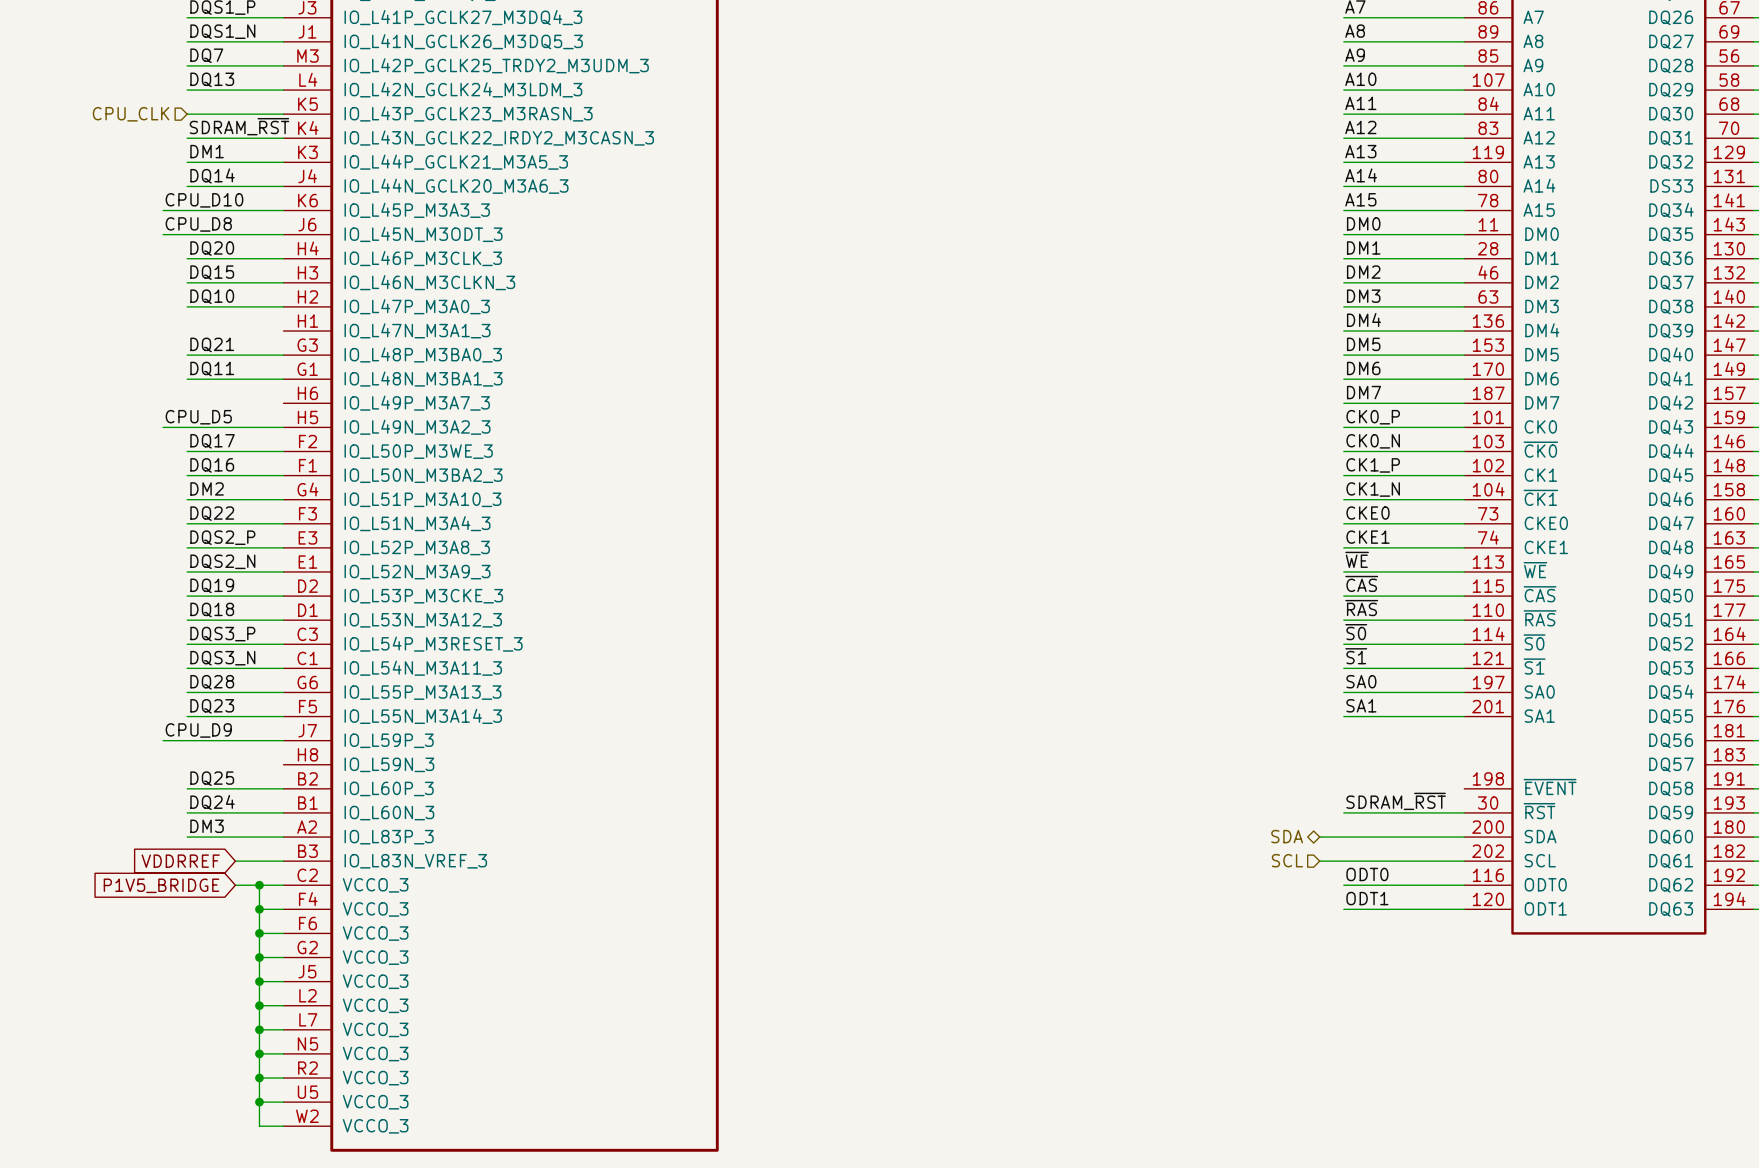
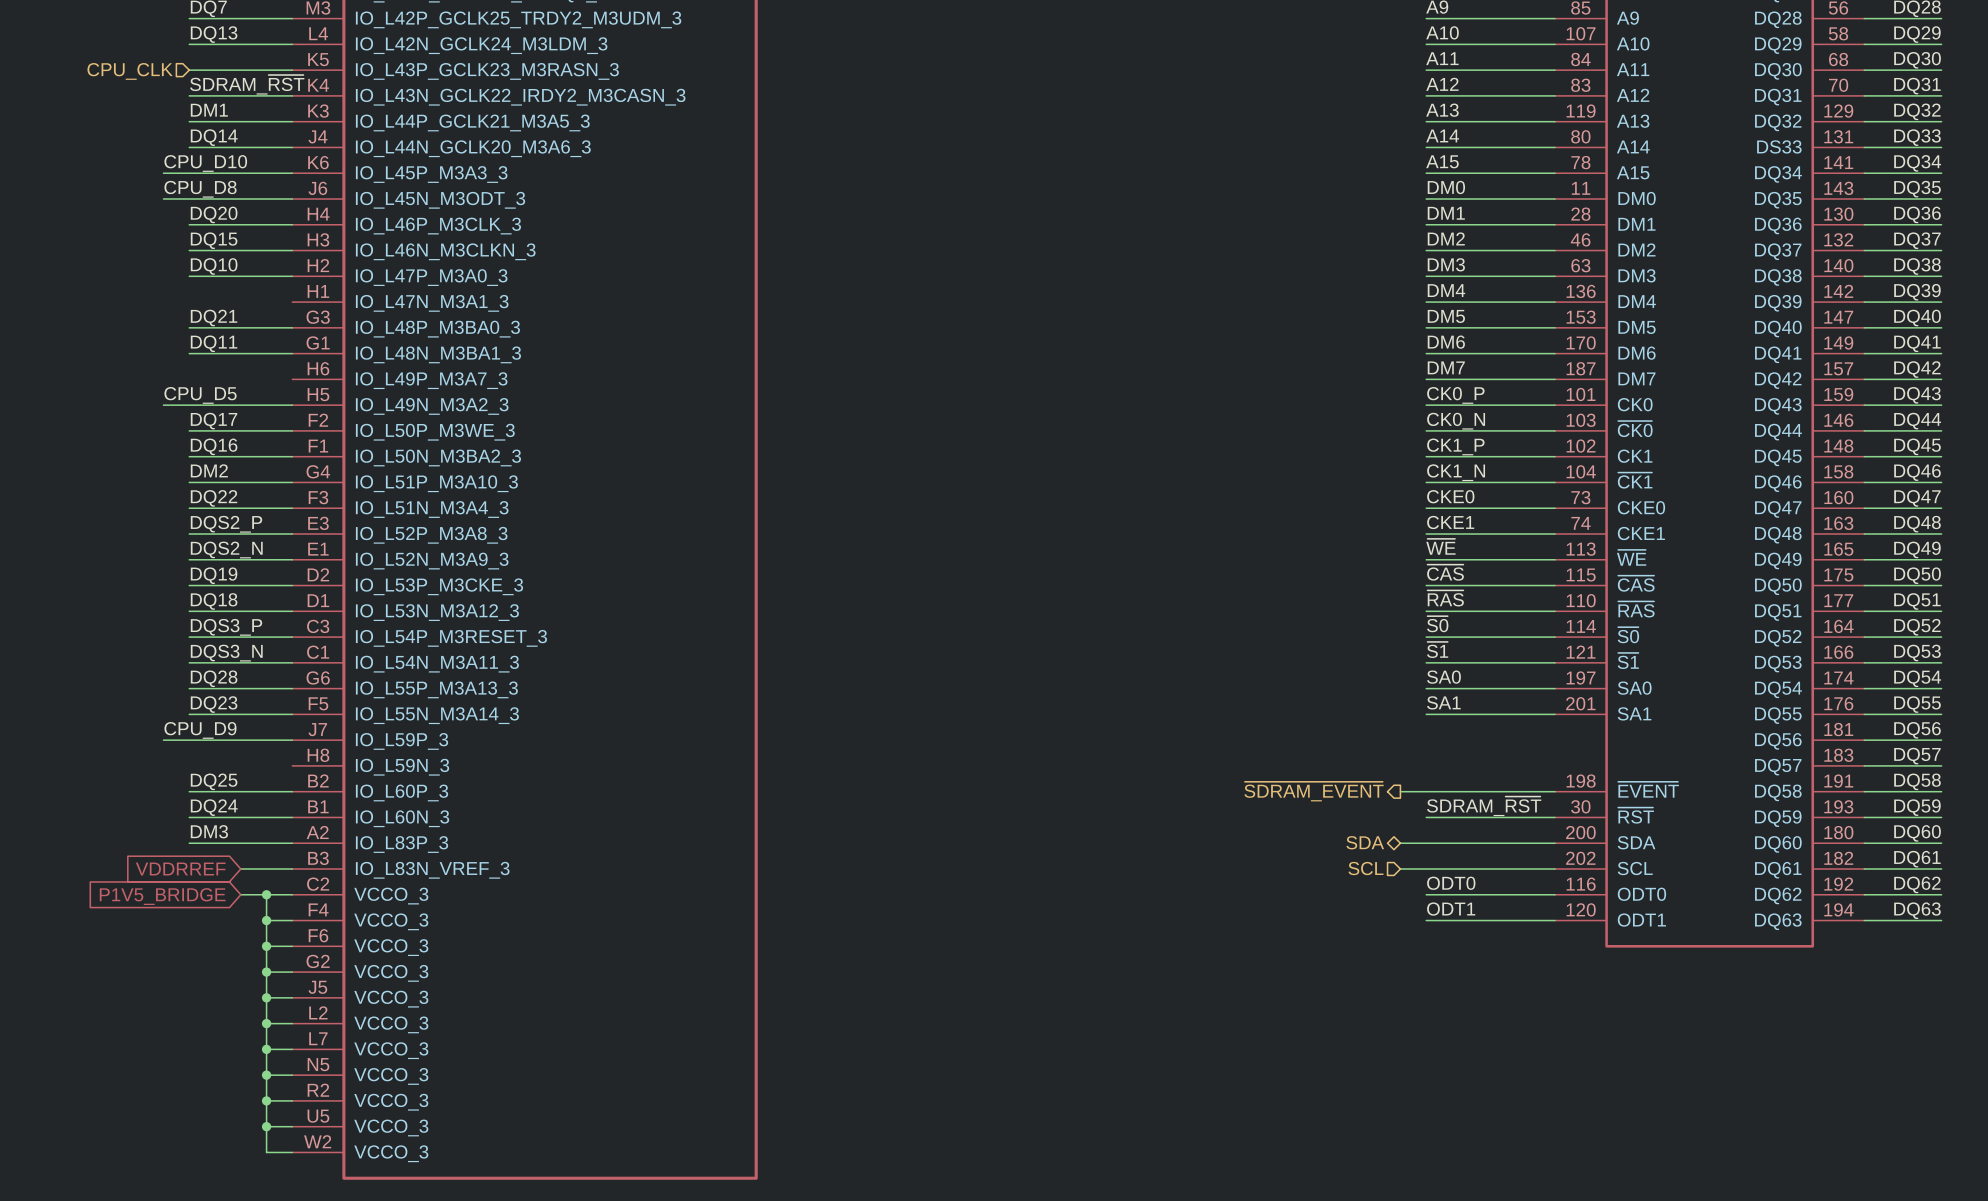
hierarchical label: none -> ~{SDRAM_EVENT} (1314, 791)
wire: none -> (1400, 791) (1555, 791)

